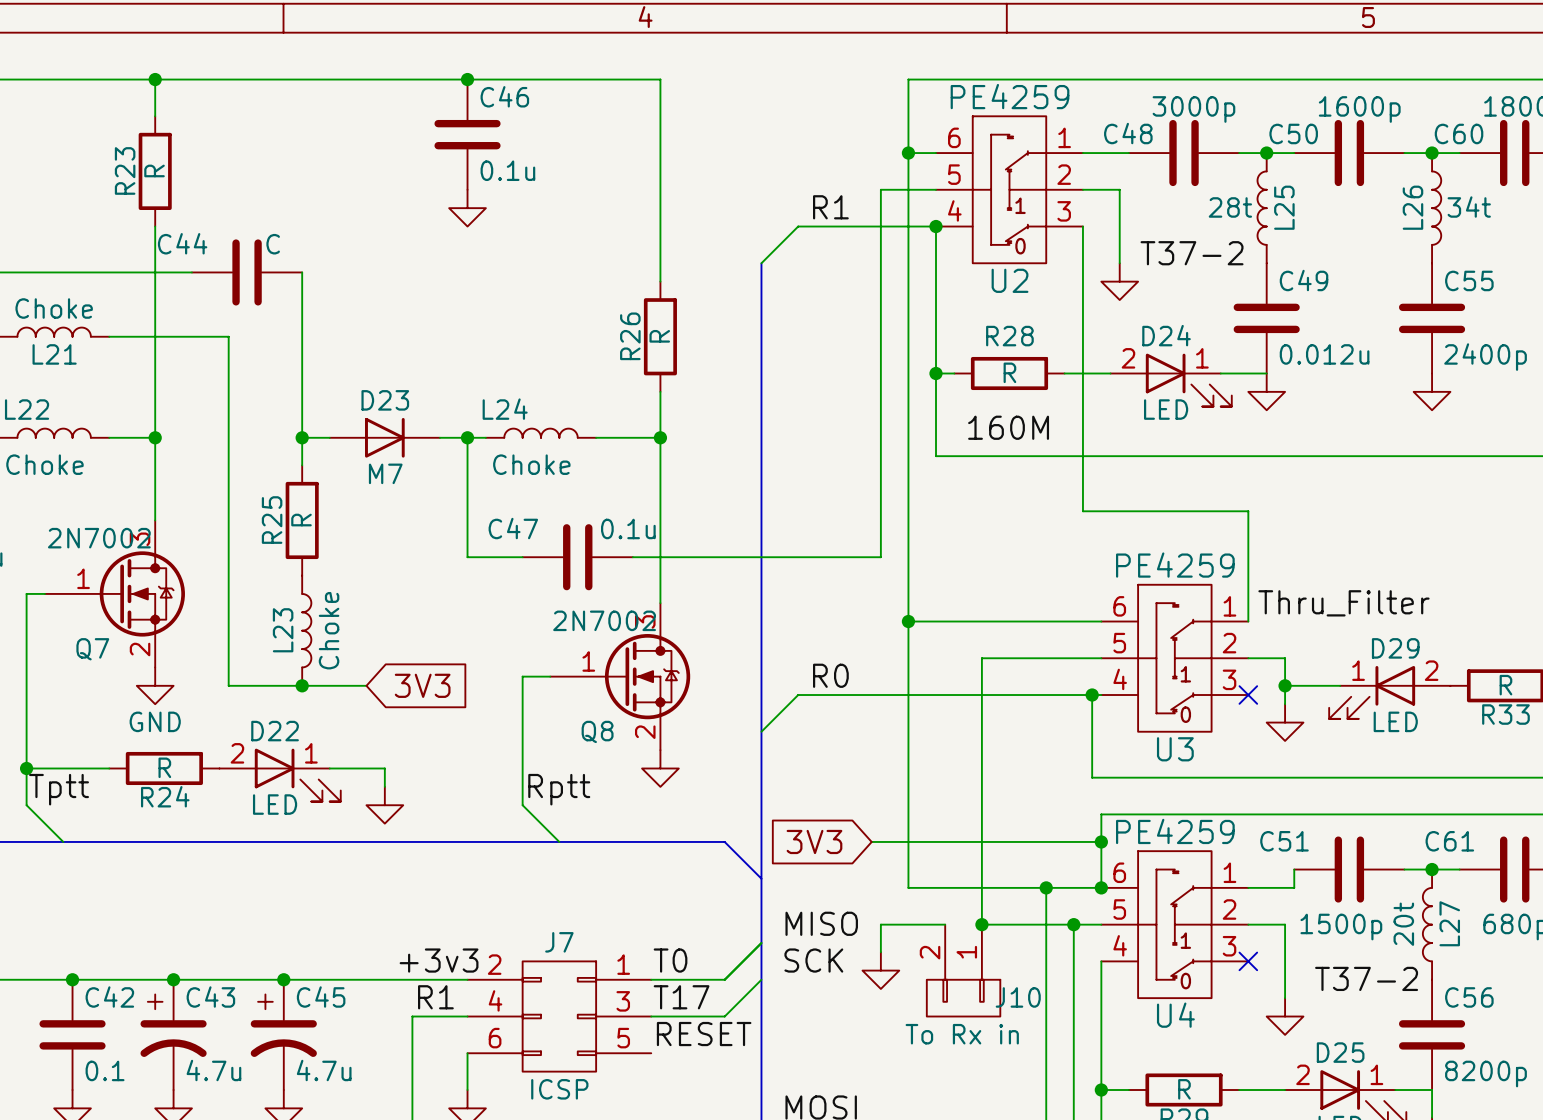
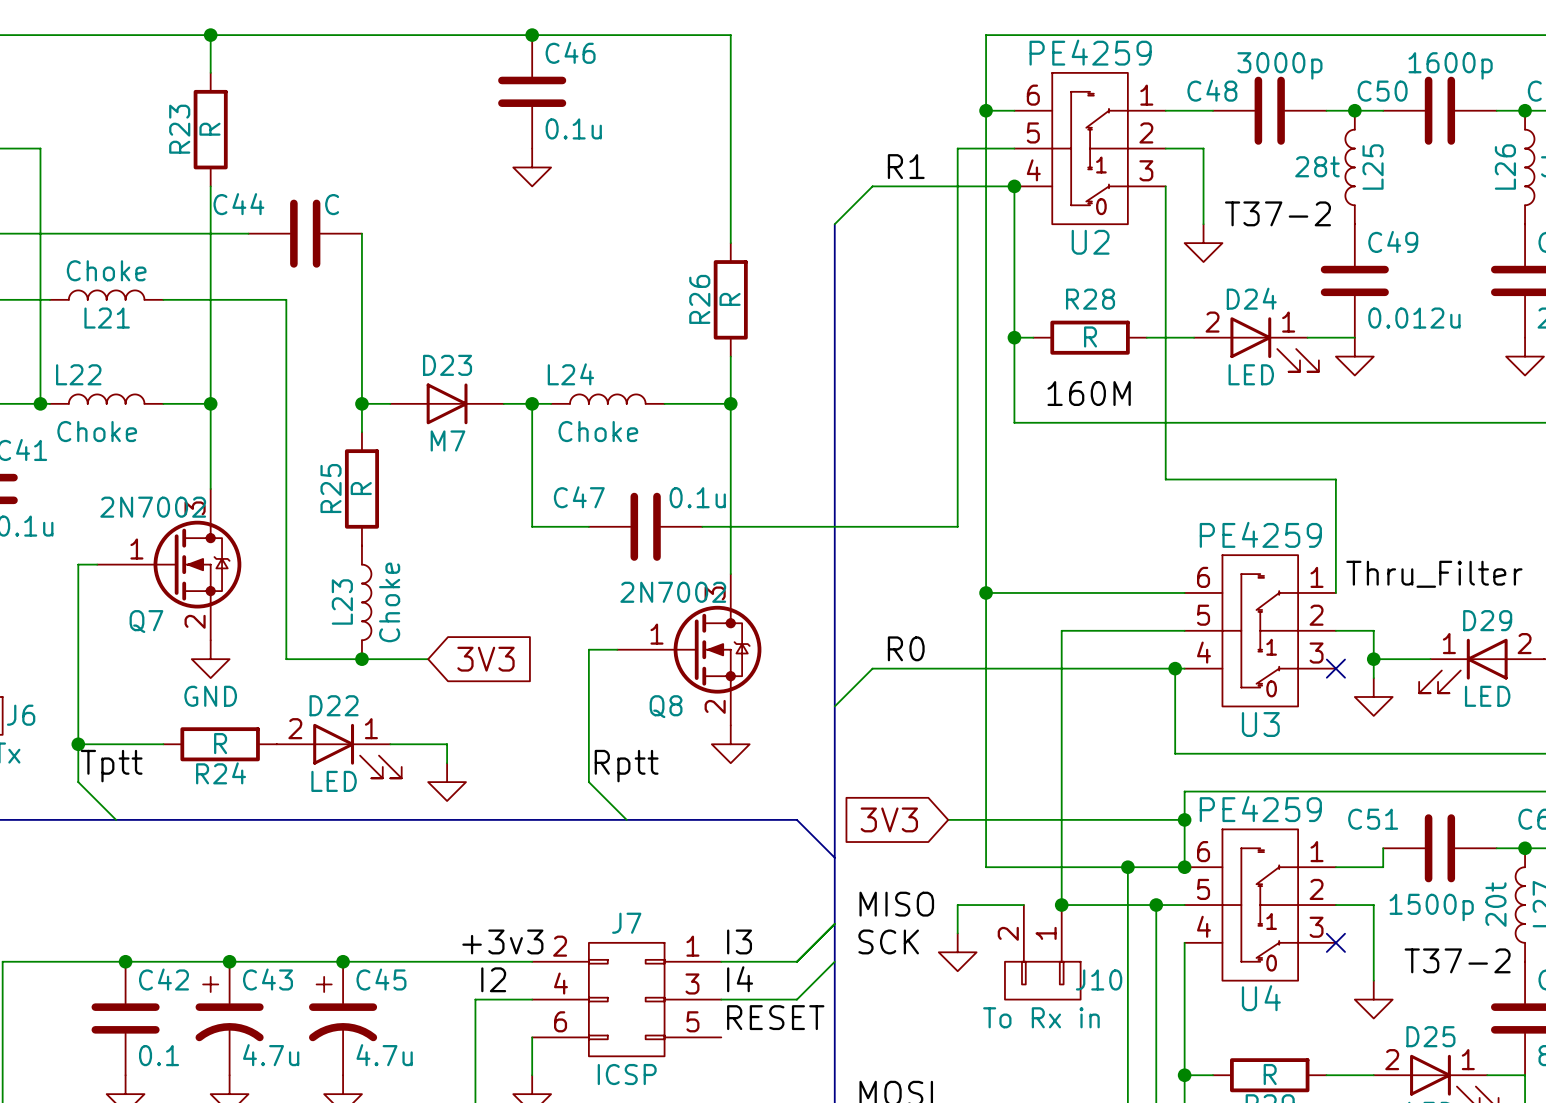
label: T0 (670, 960) -> I3 (739, 941)
label: R1 (435, 997) -> I2 (493, 979)
label: T17 (681, 997) -> I4 (740, 979)

